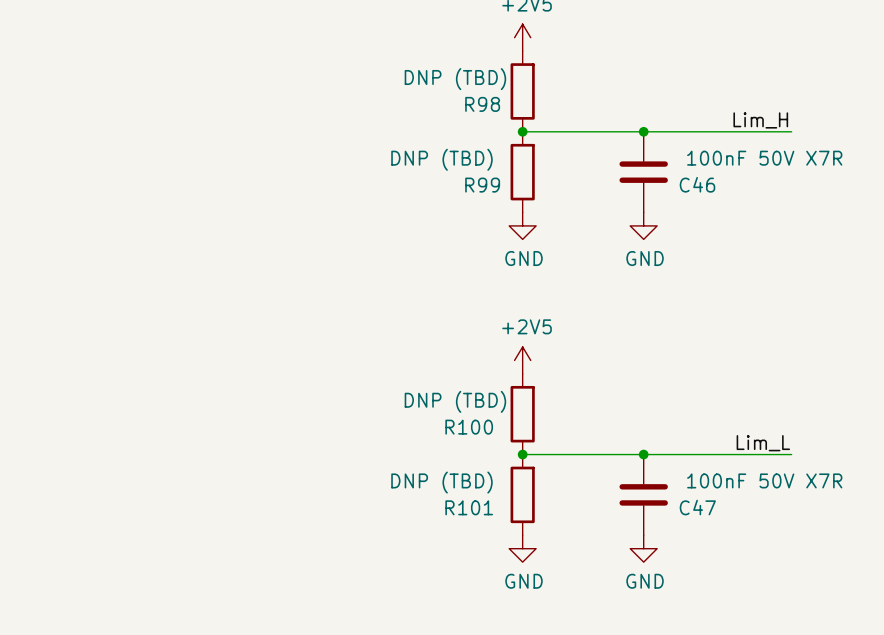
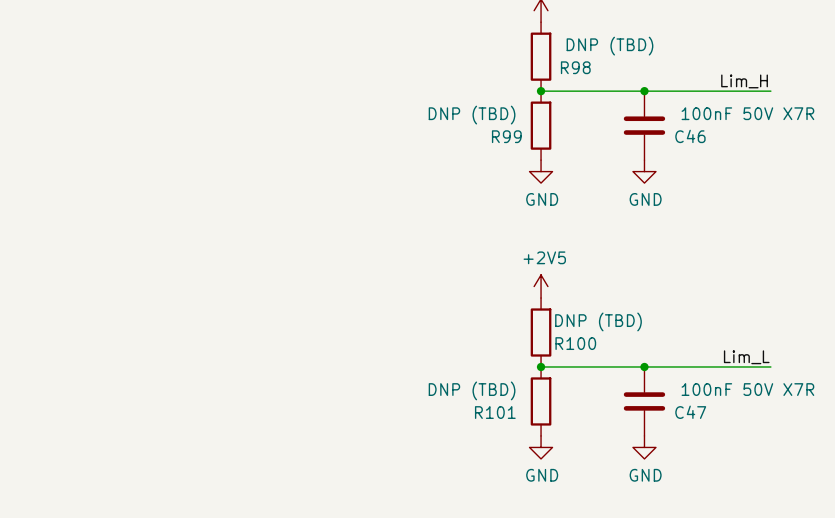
R98 value position: DNP (TBD) (455, 79) -> DNP (TBD) (609, 46)
R98 name position: R98 (482, 104) -> R98 (575, 67)
R100 value position: DNP (TBD) (455, 401) -> DNP (TBD) (598, 321)
R100 name position: R100 (469, 427) -> R100 (575, 343)

